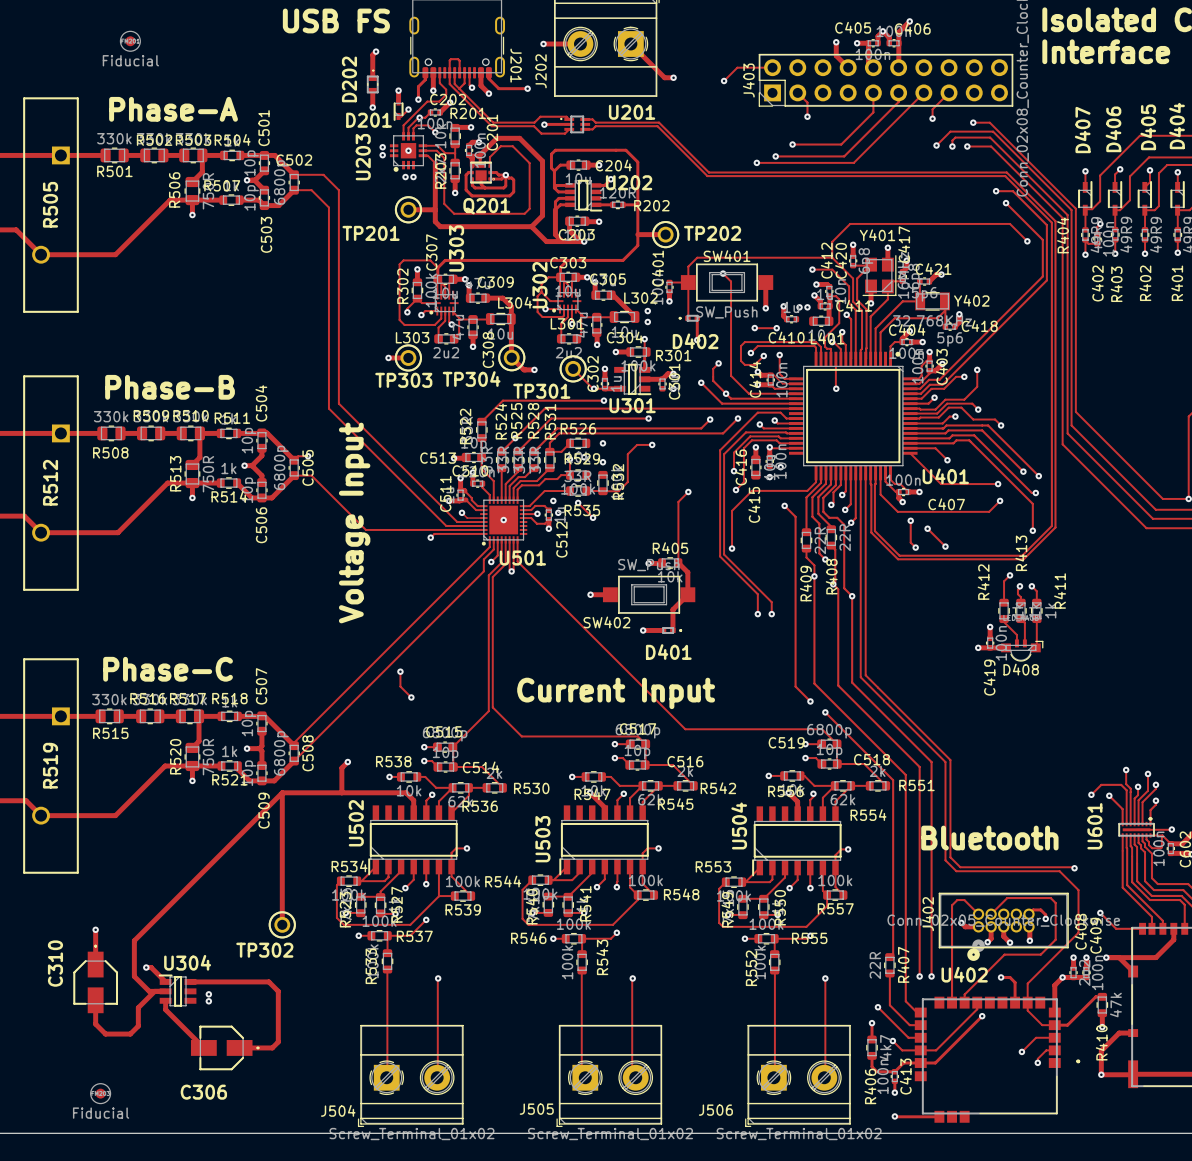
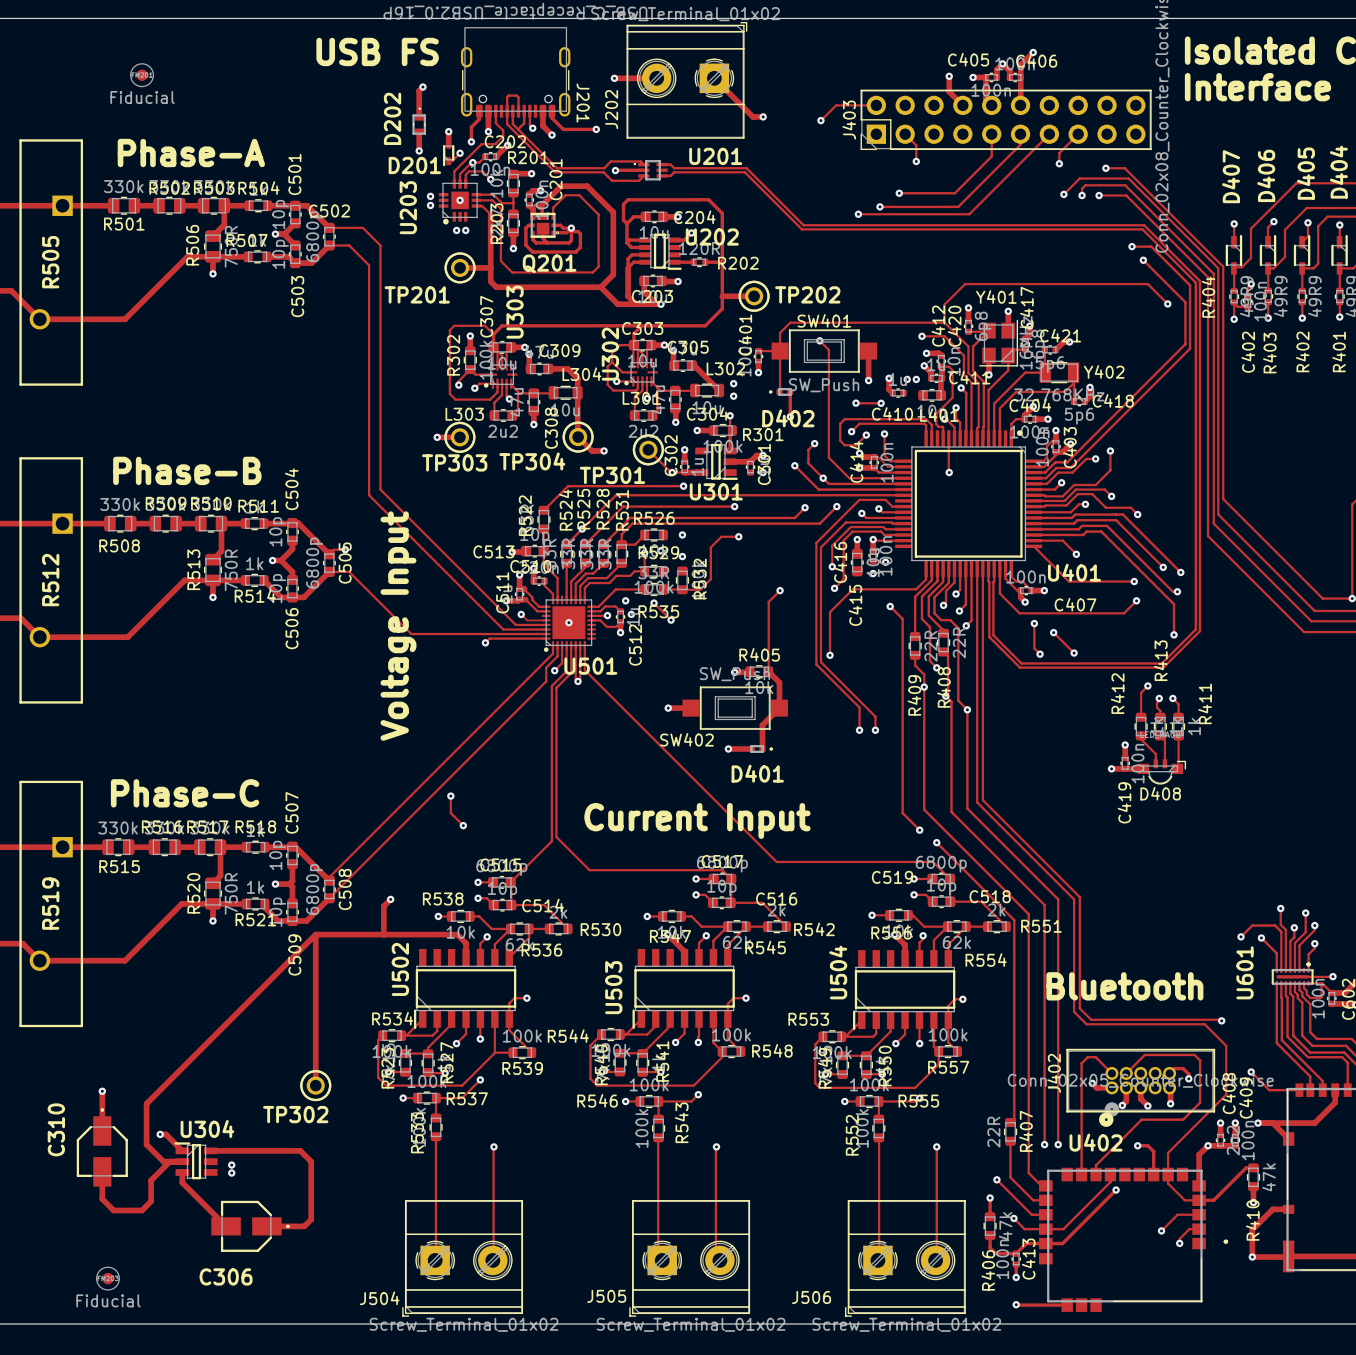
R406 value: 4k7 (885, 1047) -> 47k (1005, 1226)

